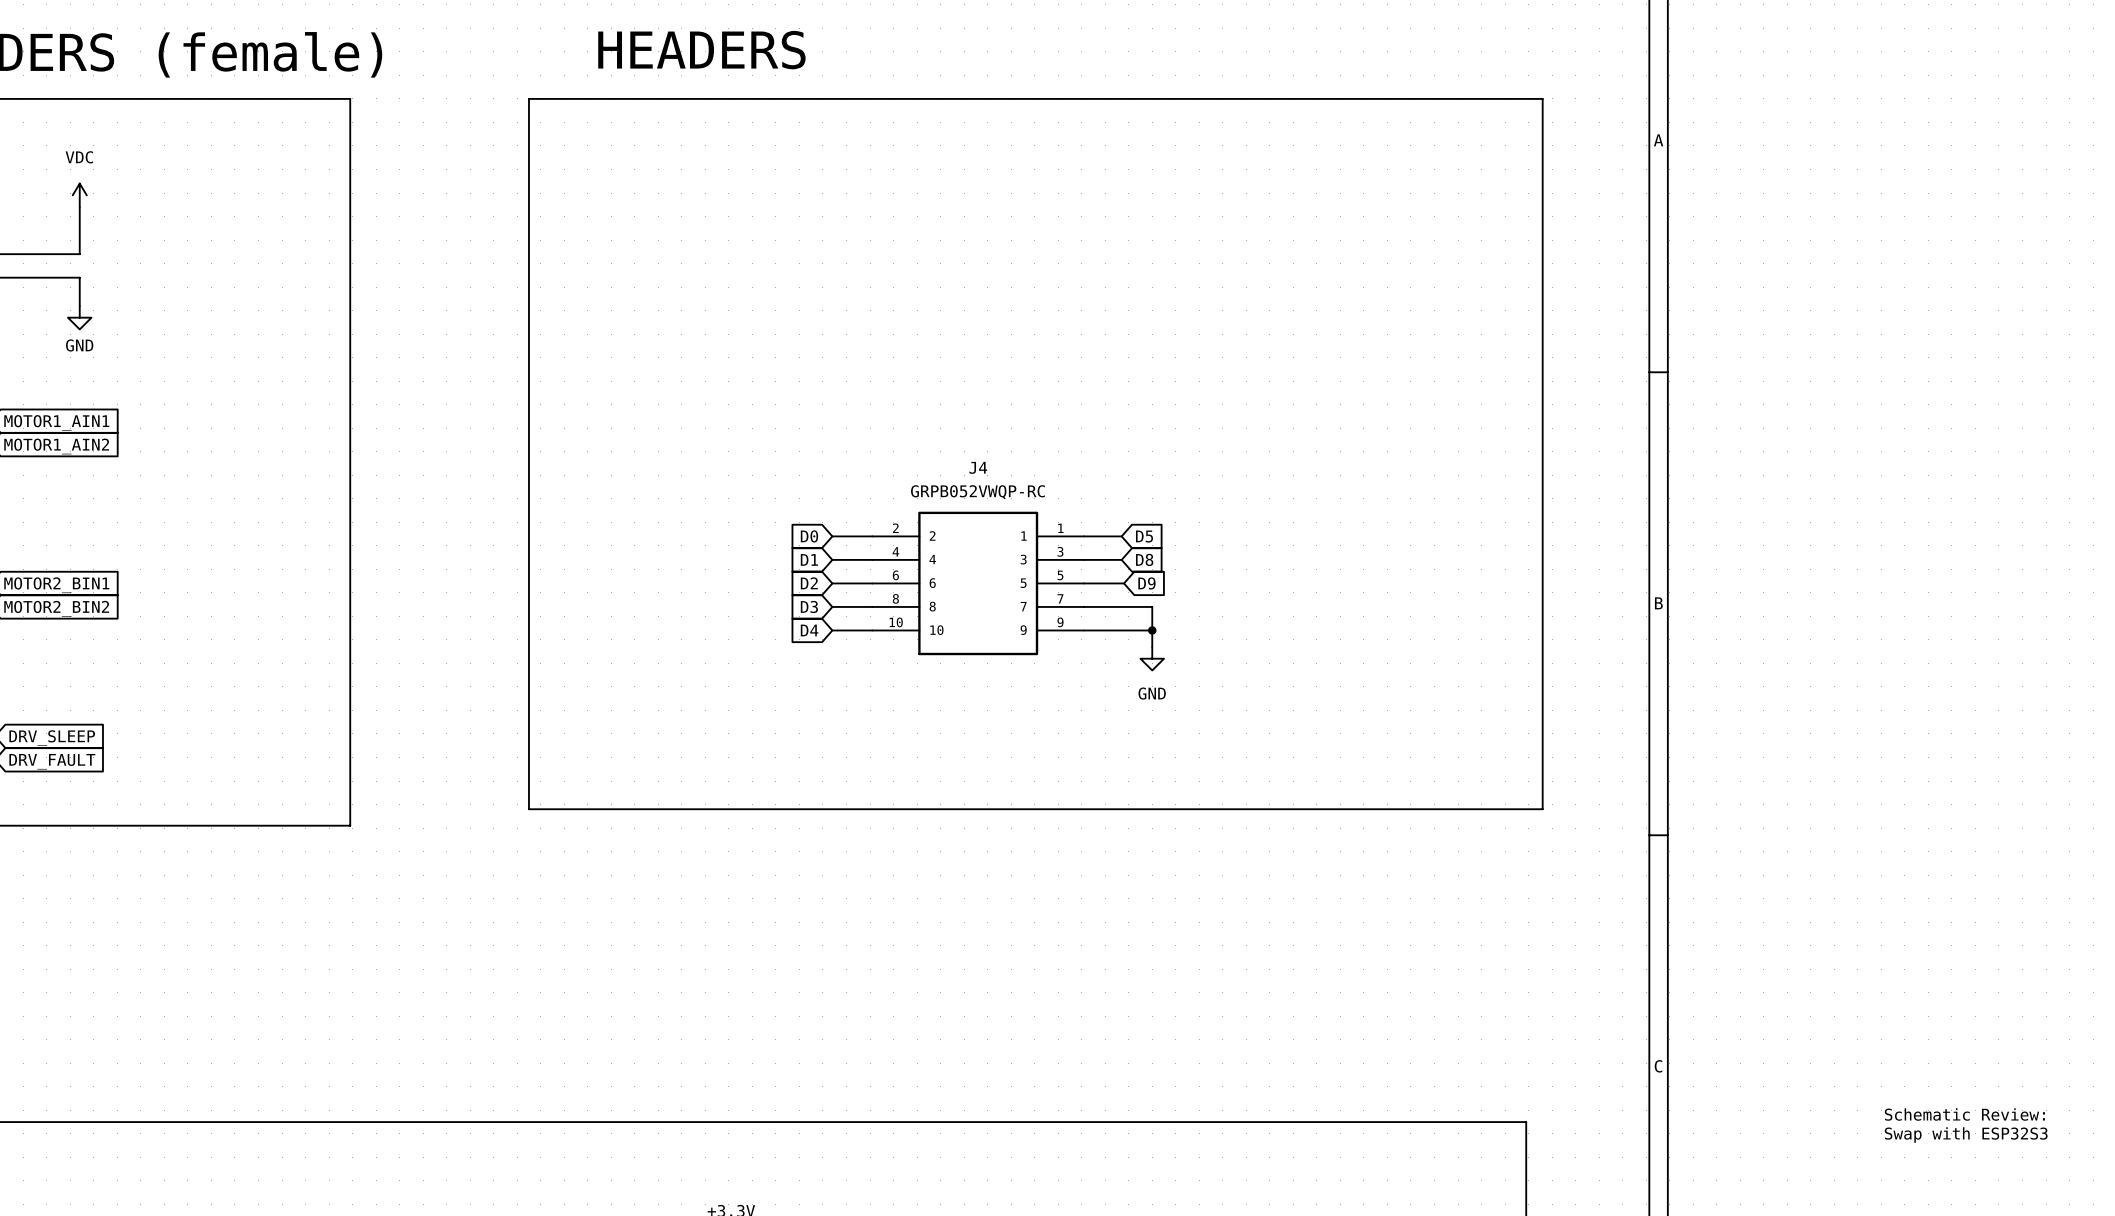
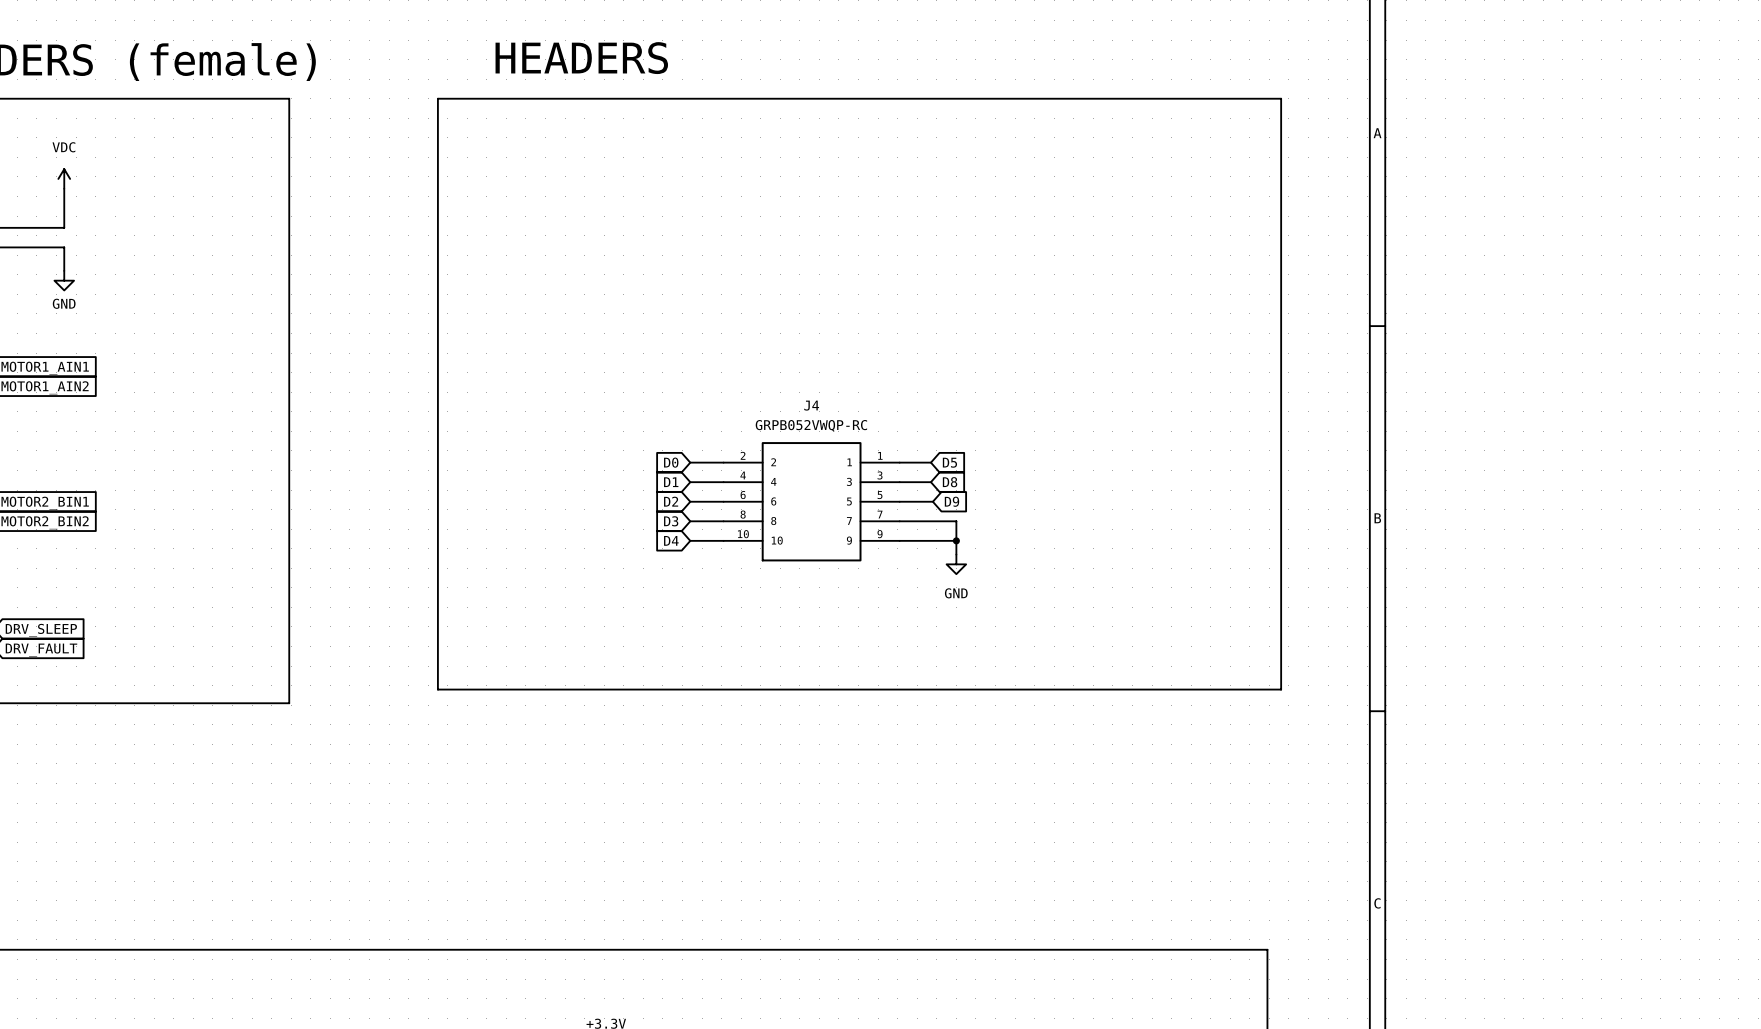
text: Schematic Review: (1964, 1114) -> none
text: Swap with ESP32S3 (1966, 1135) -> none

